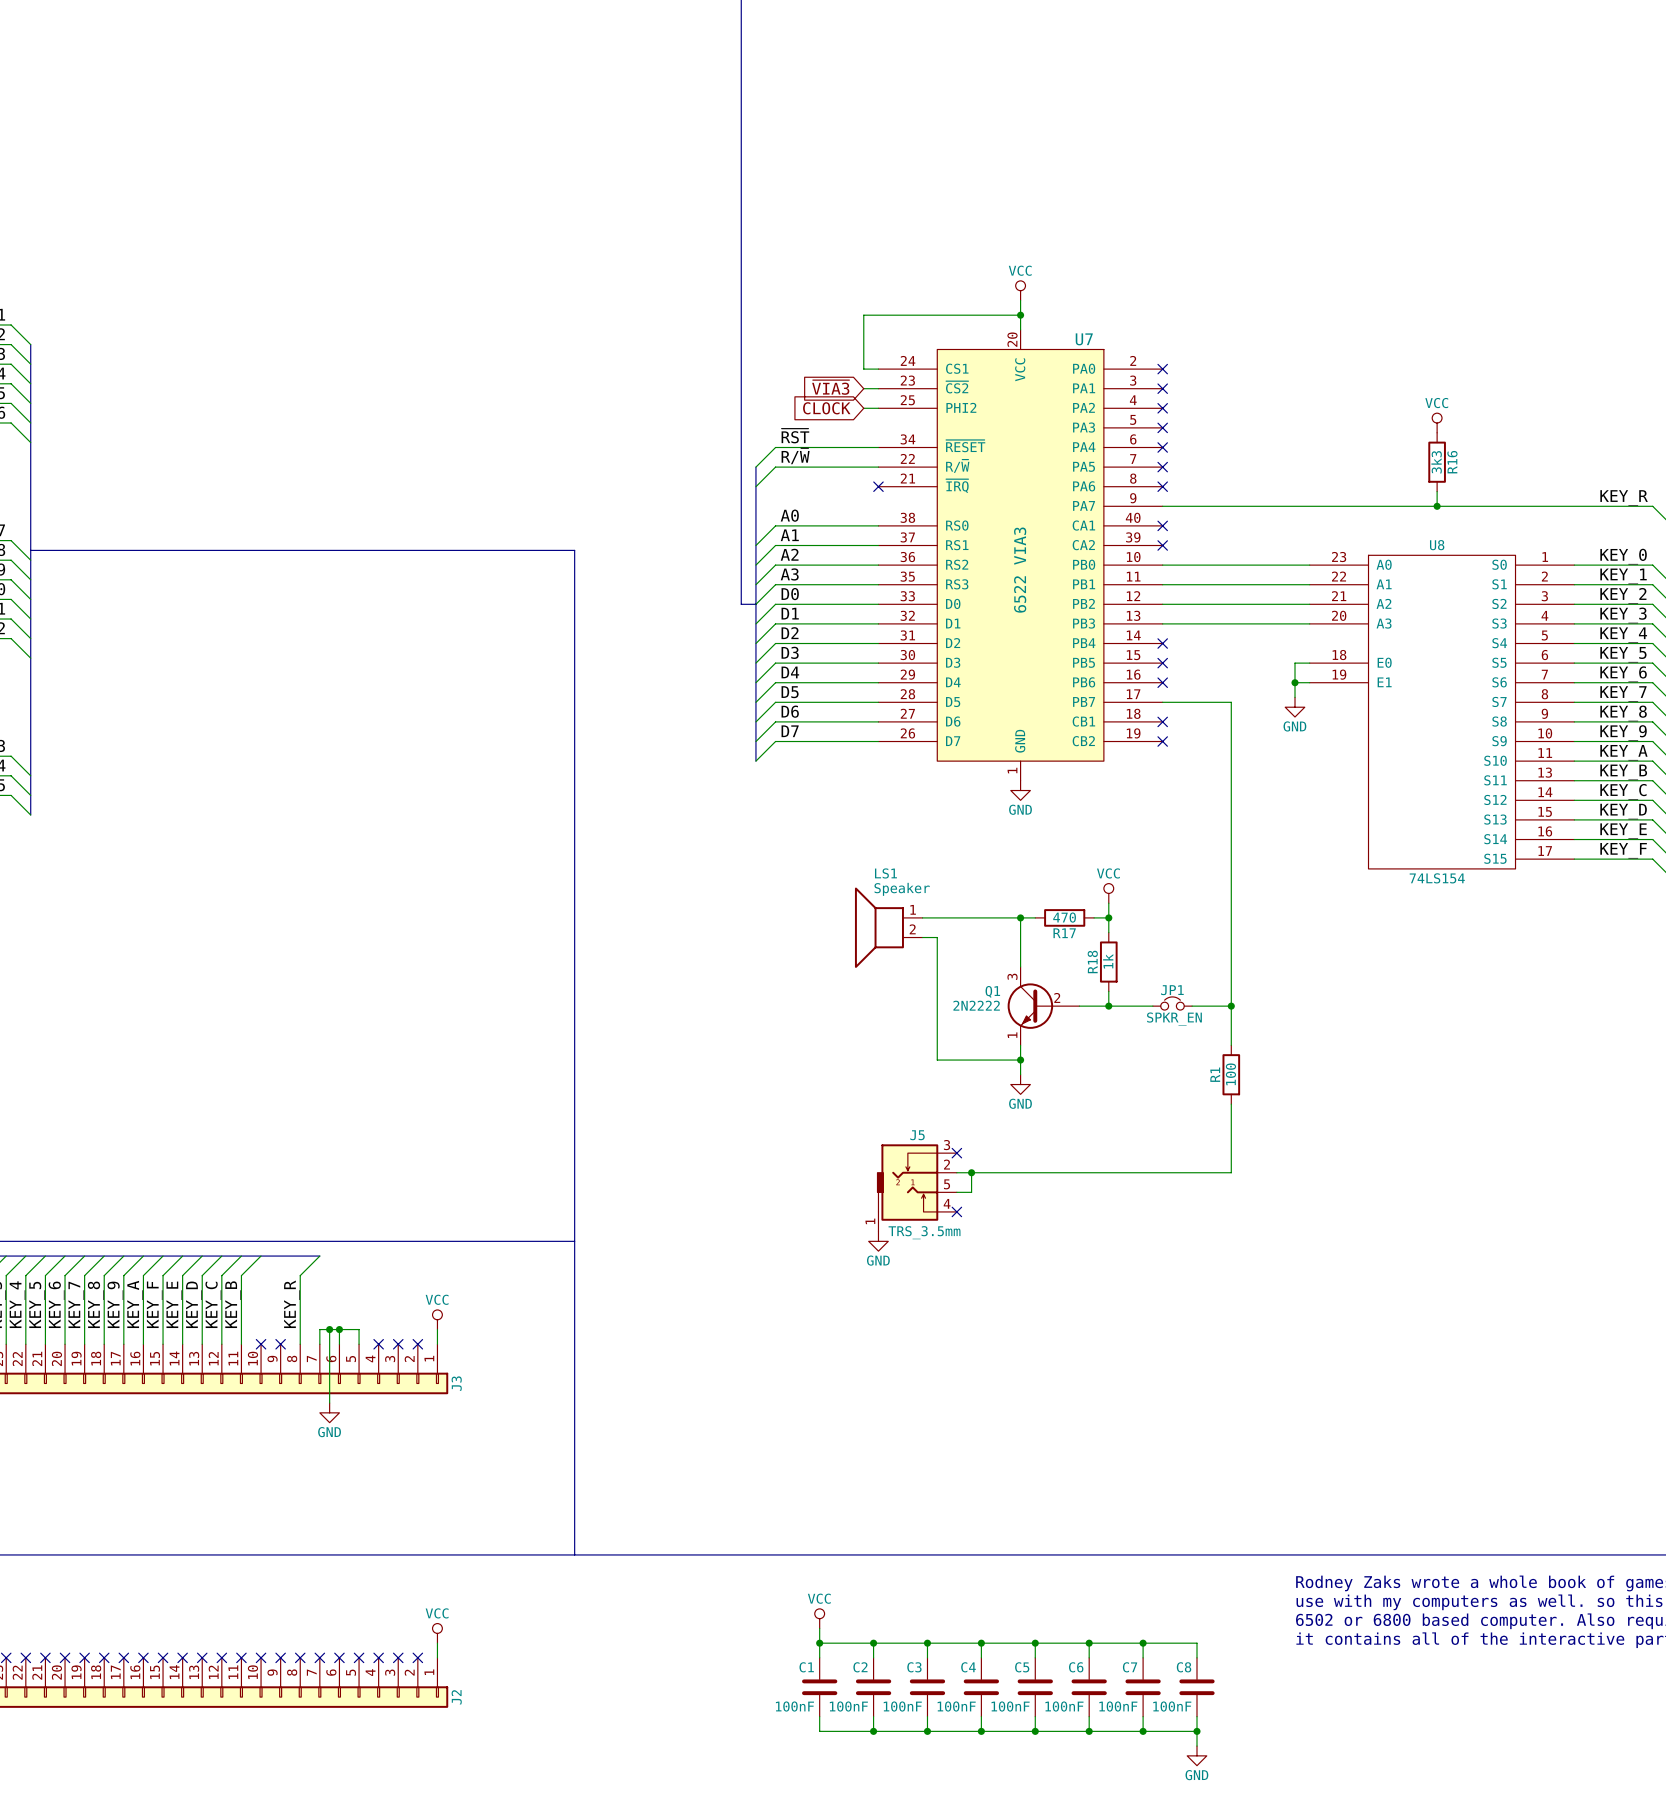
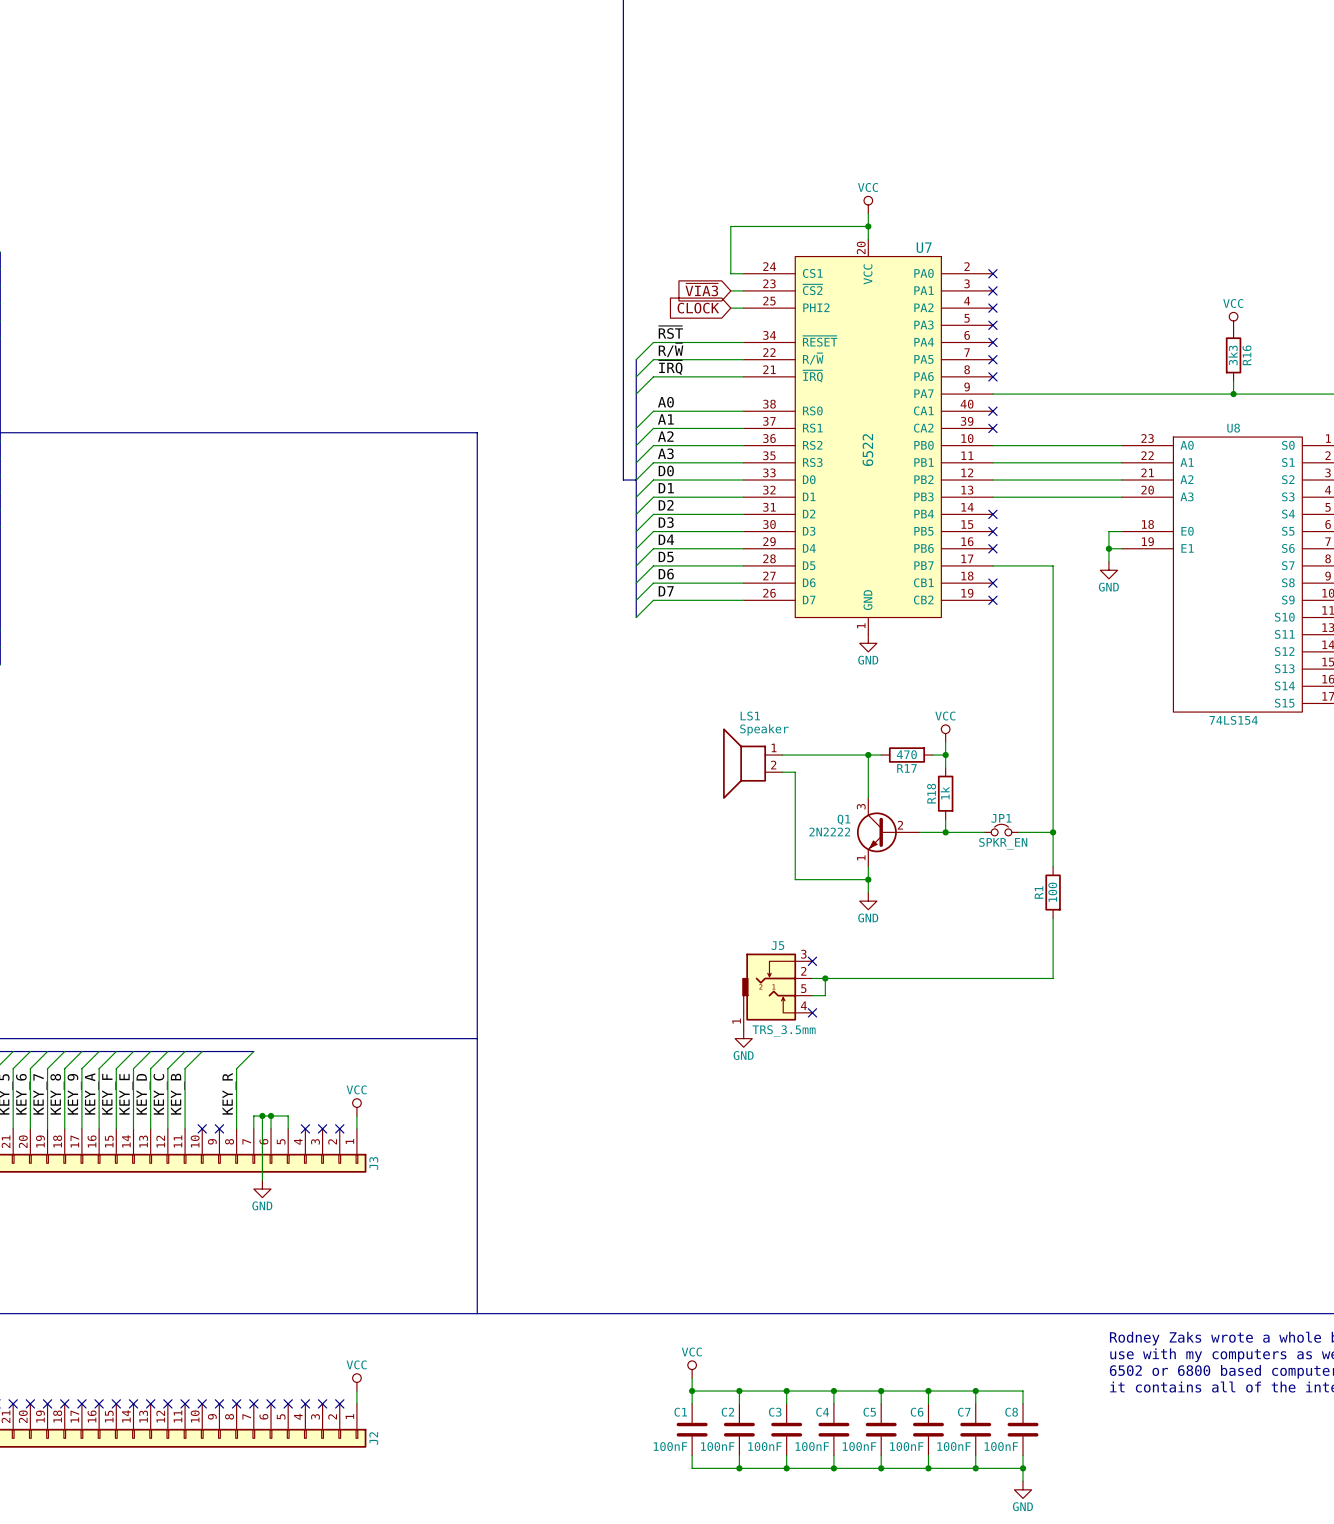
label: none -> ~{IRQ} (670, 367)
wire: none -> (743, 376) (653, 376) (636, 394)
no-connect mark: (878, 486) -> none
U7 value: 6522 VIA3 (1020, 570) -> 6522 (867, 450)

